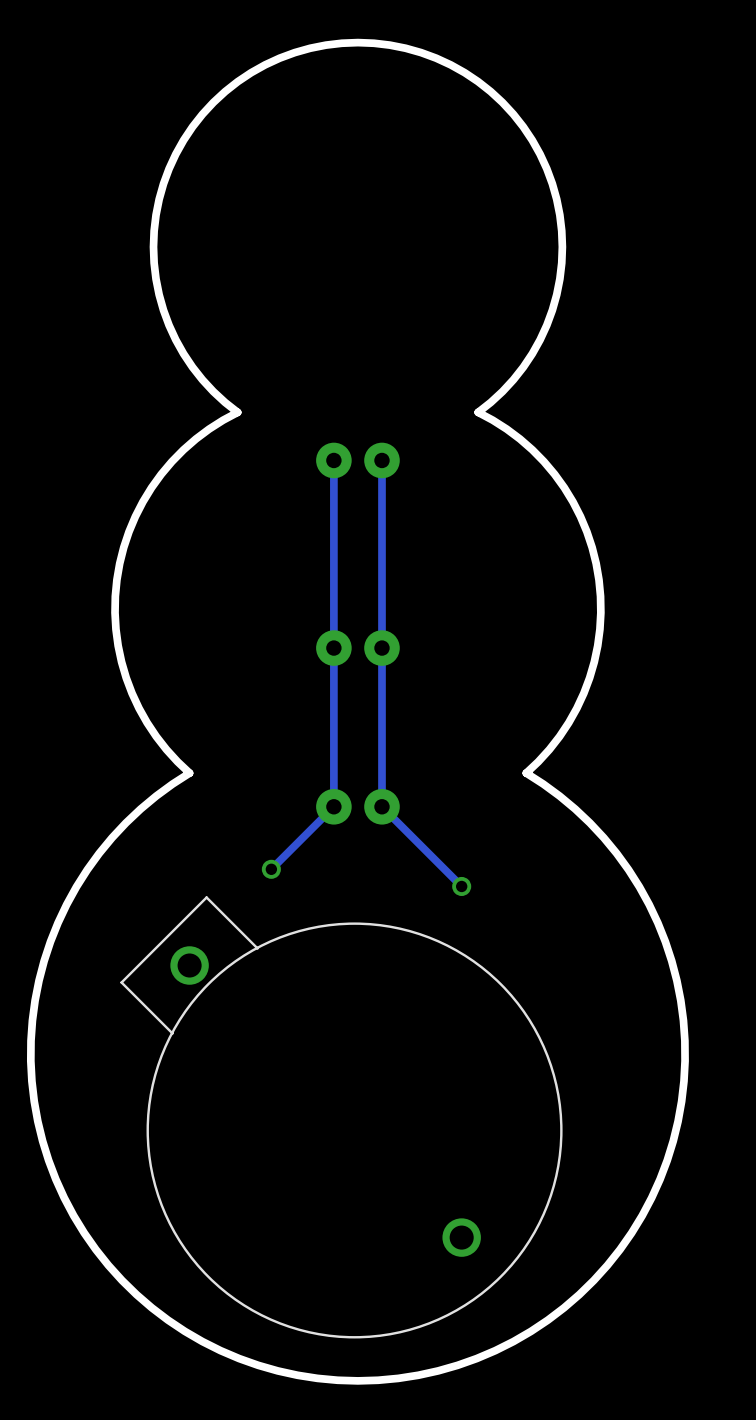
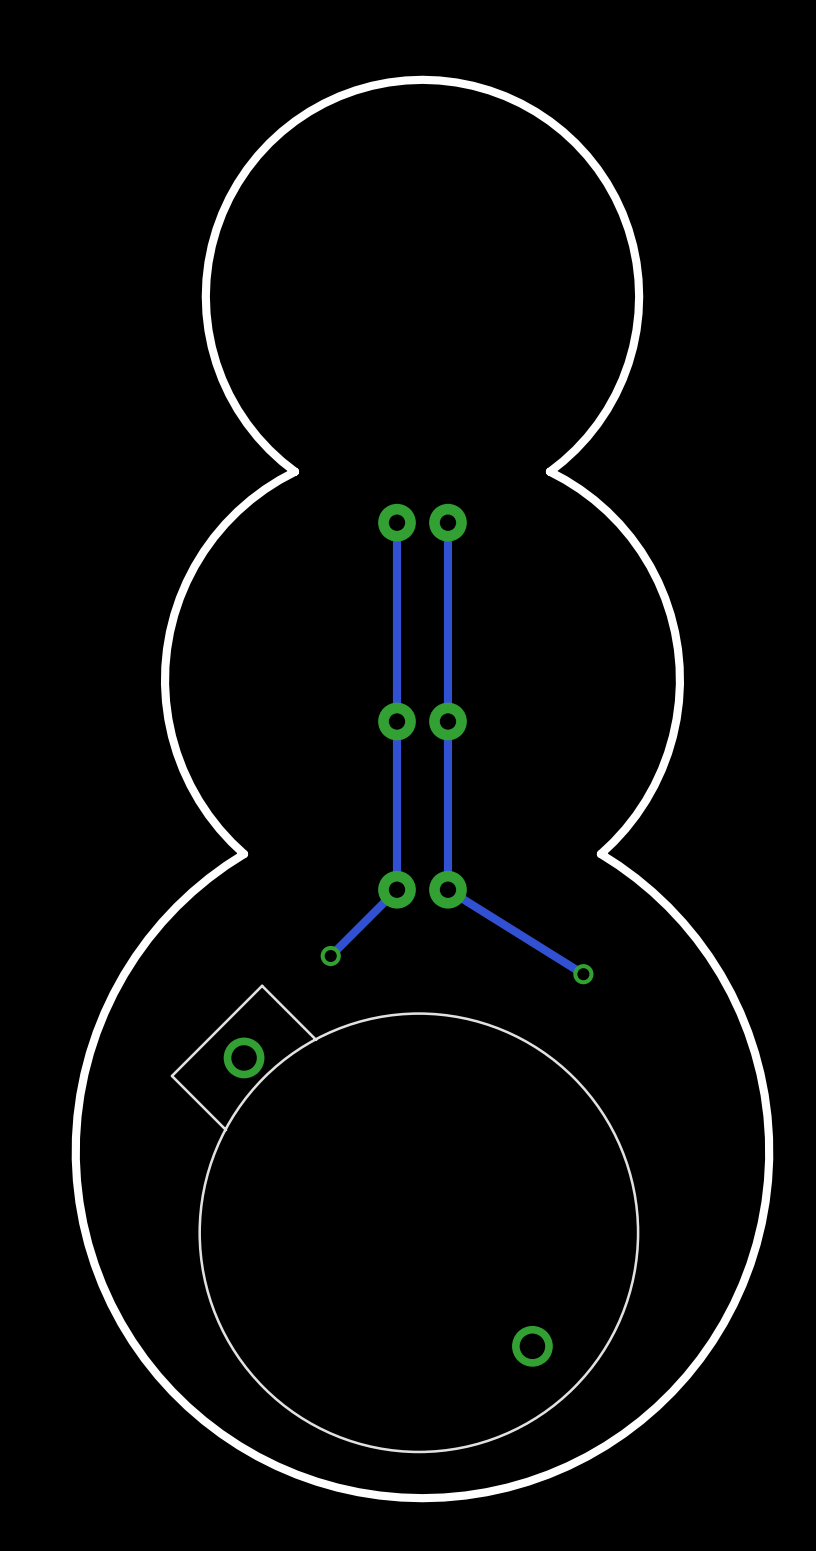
track: (381, 806) (461, 886) -> (447, 889) (583, 974)
via position: (461, 886) -> (583, 974)

